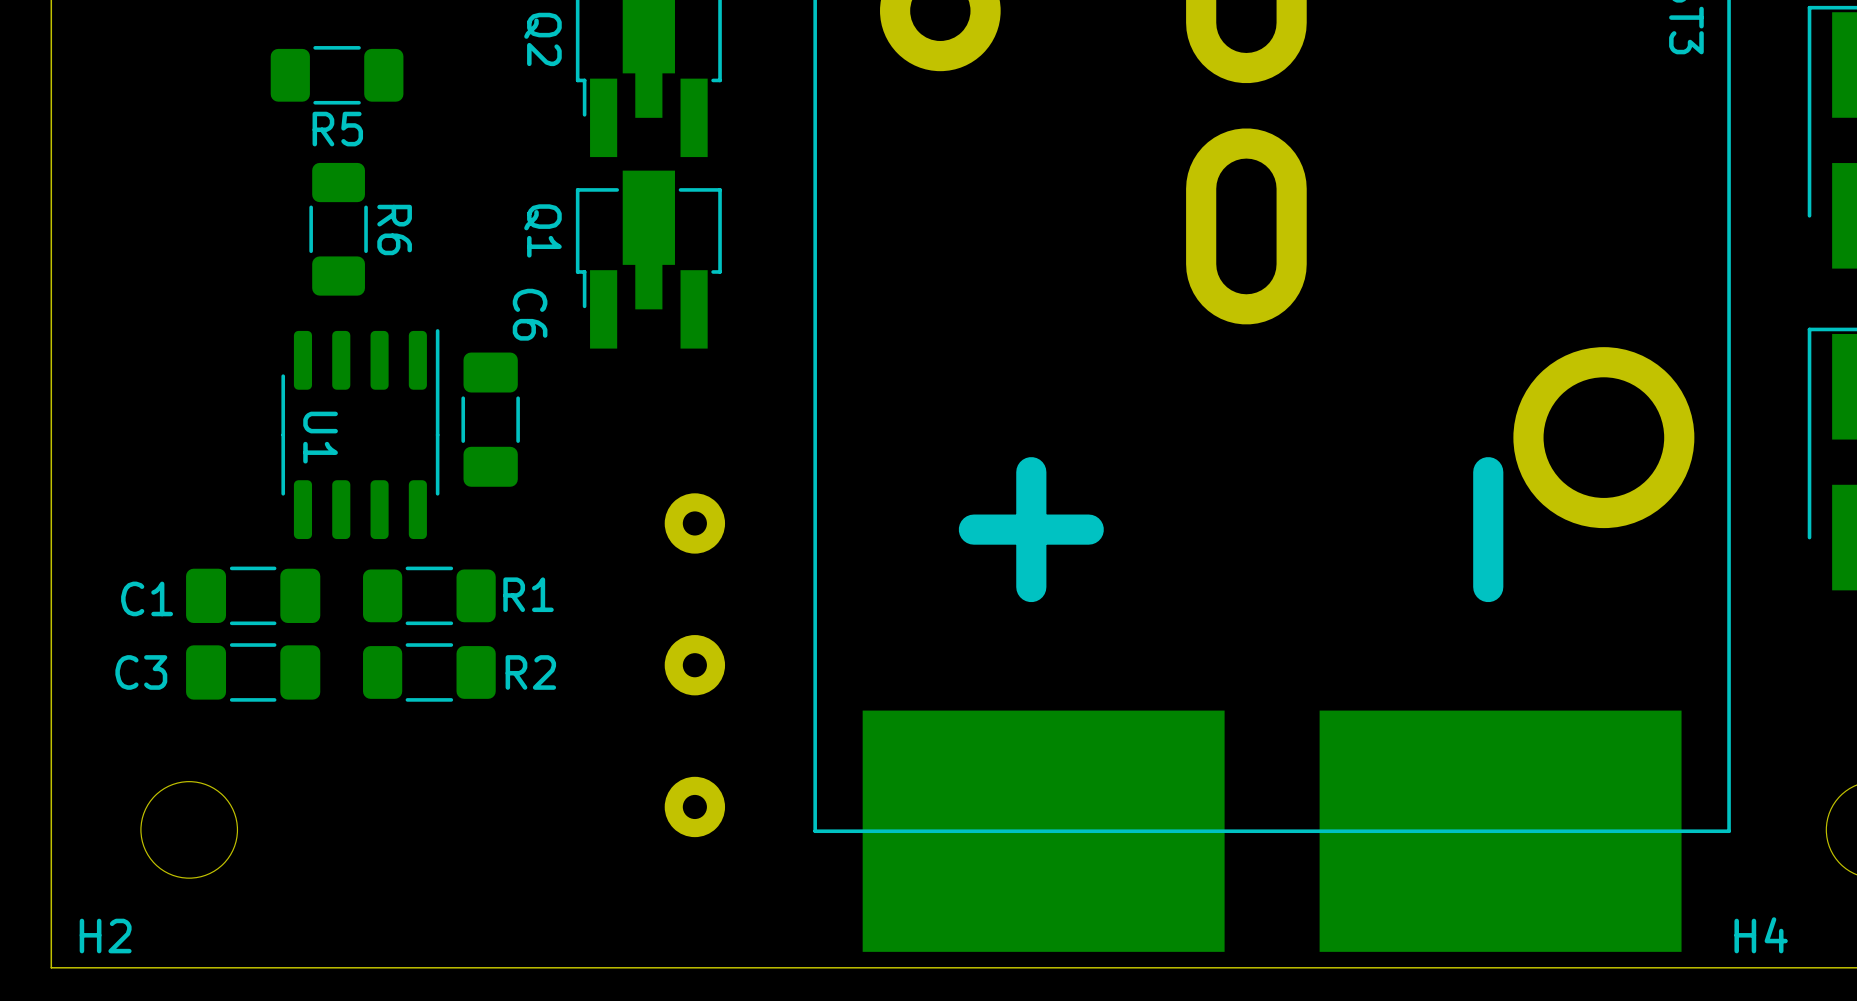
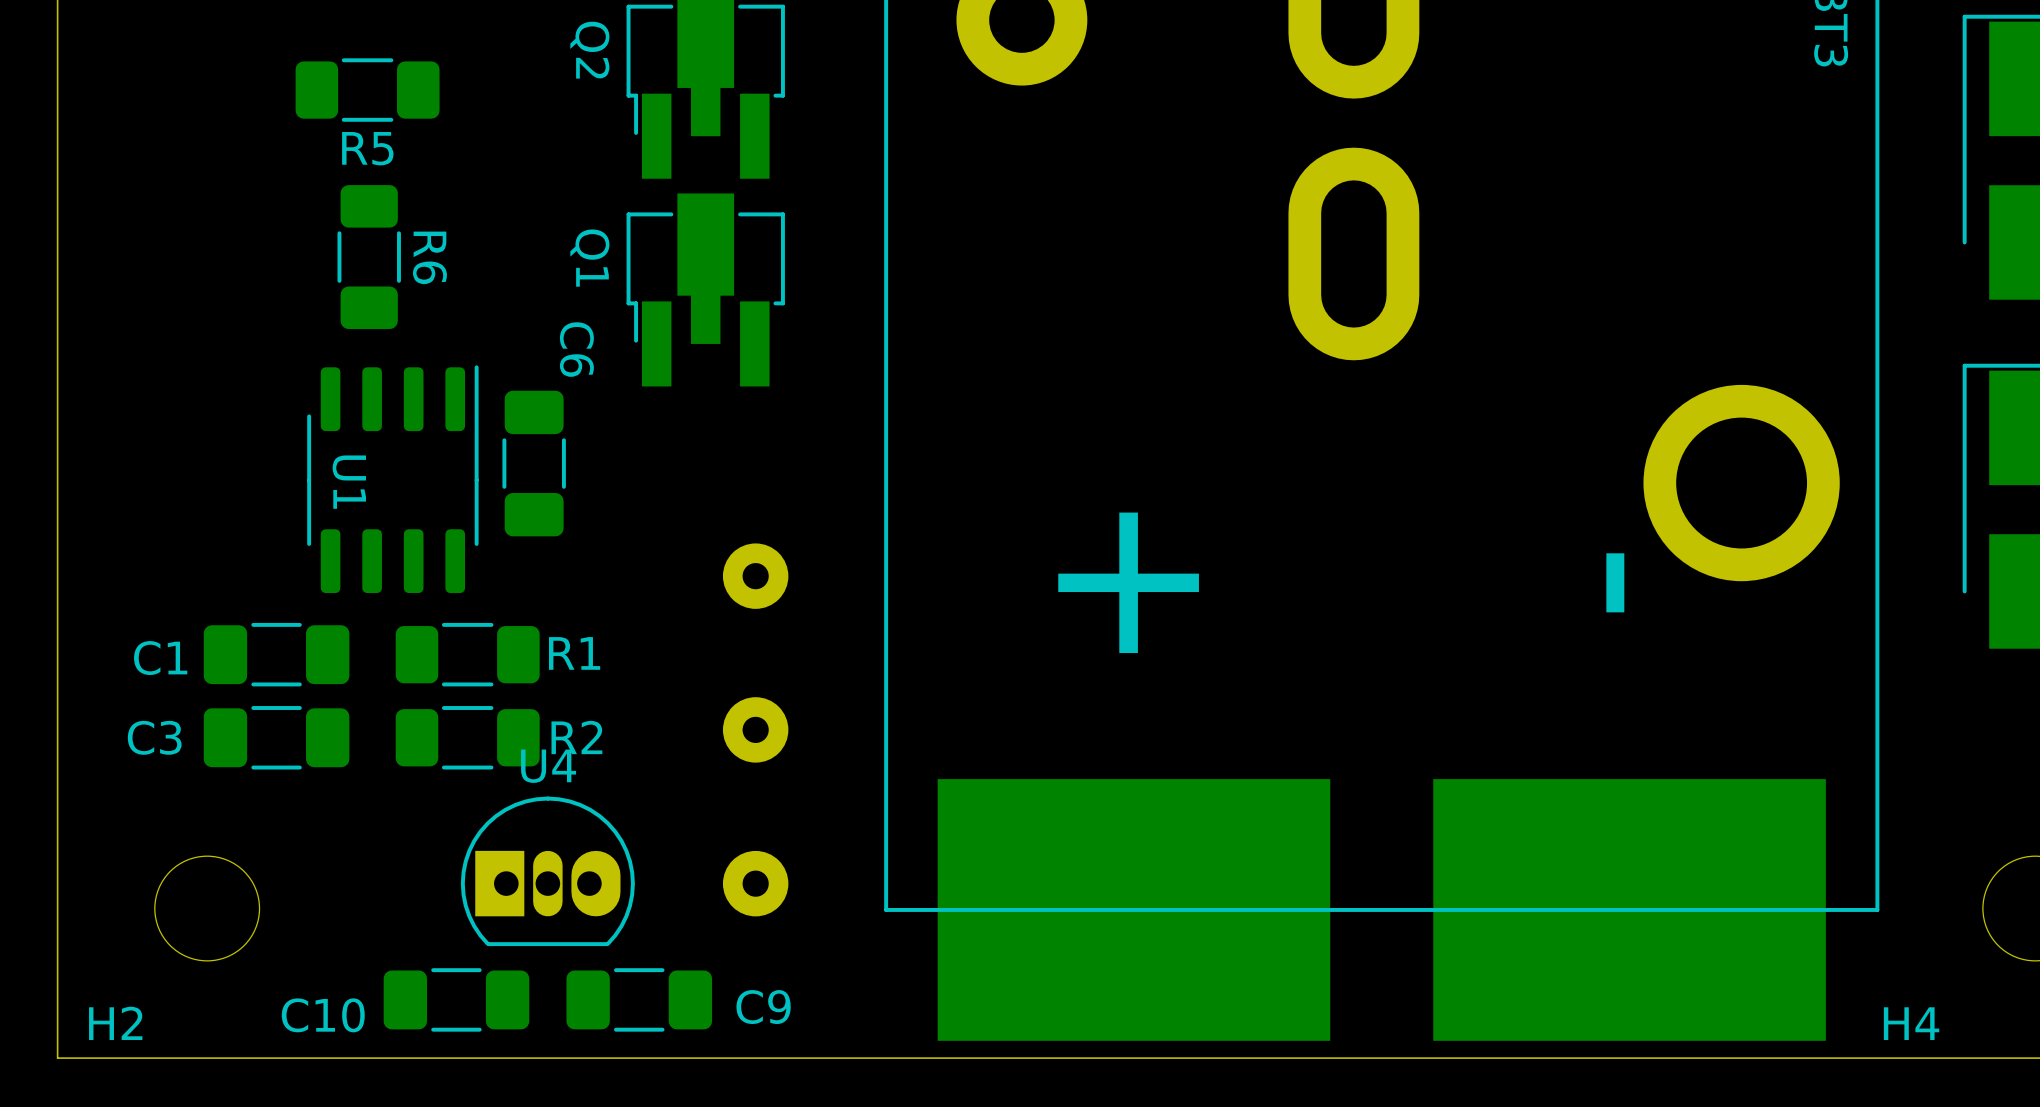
U4: none -> (547, 871)
C10: none -> (456, 999)
C9: none -> (639, 999)

